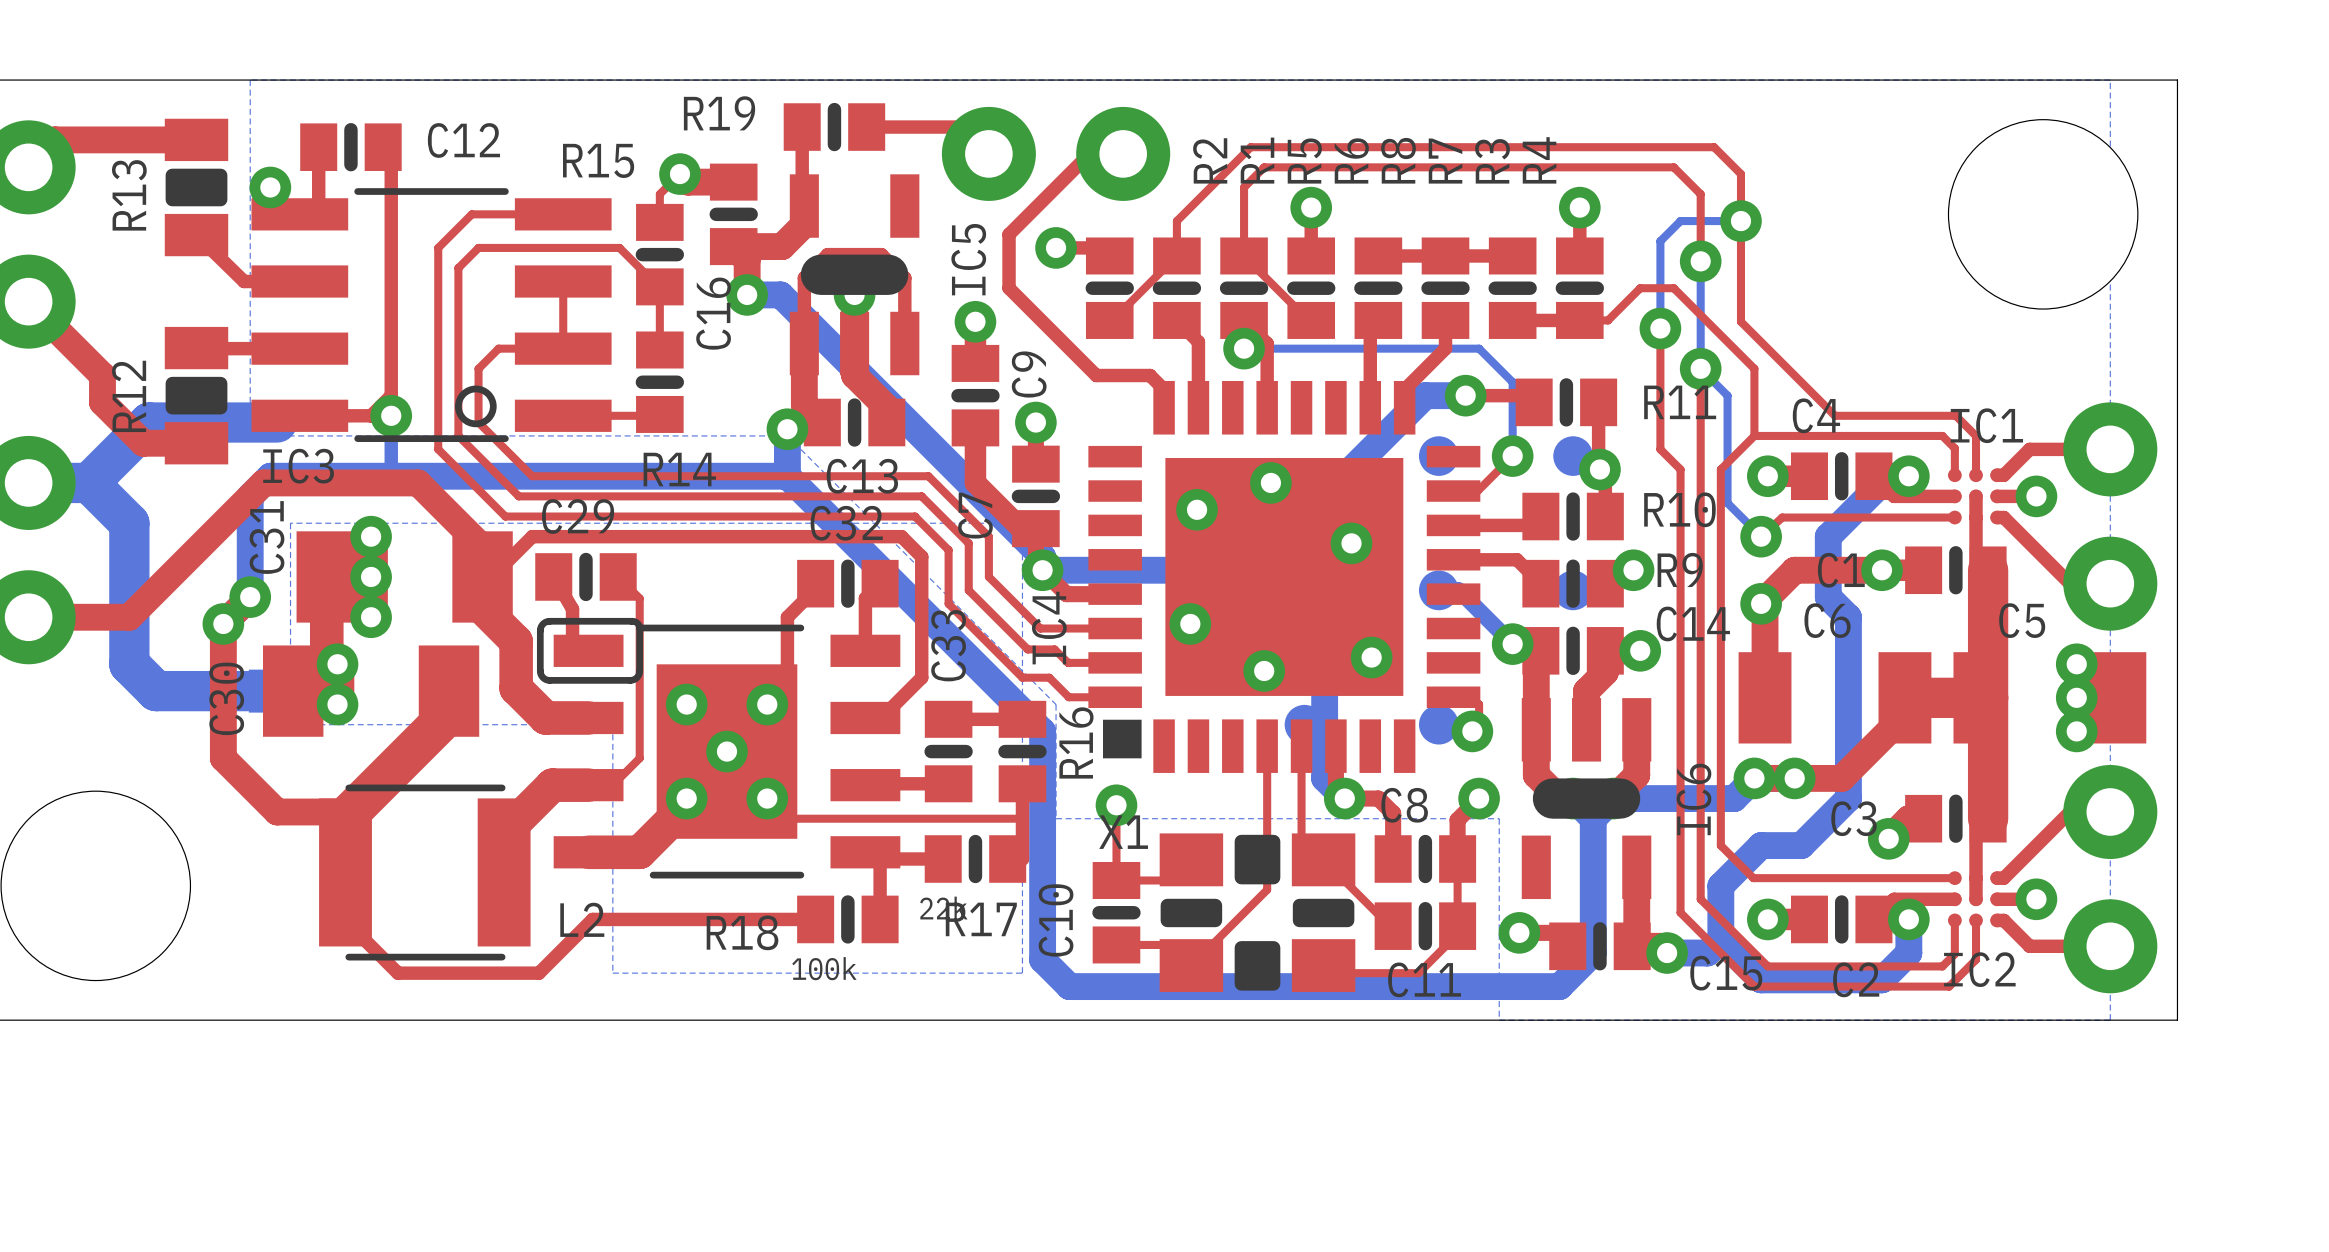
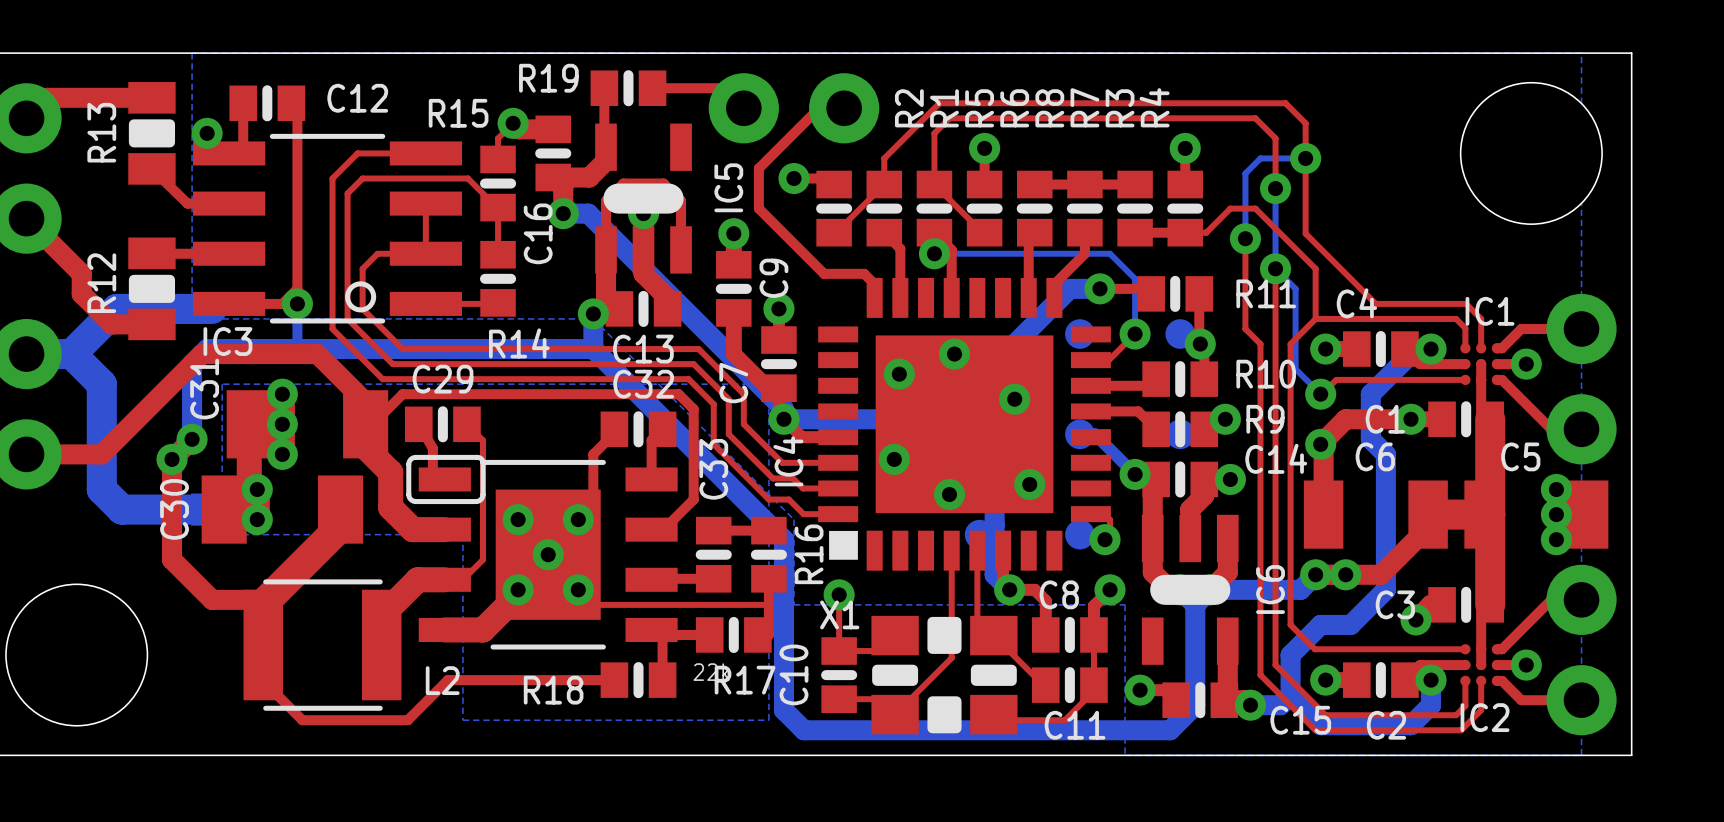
R18 value: 100k (824, 968) -> none

